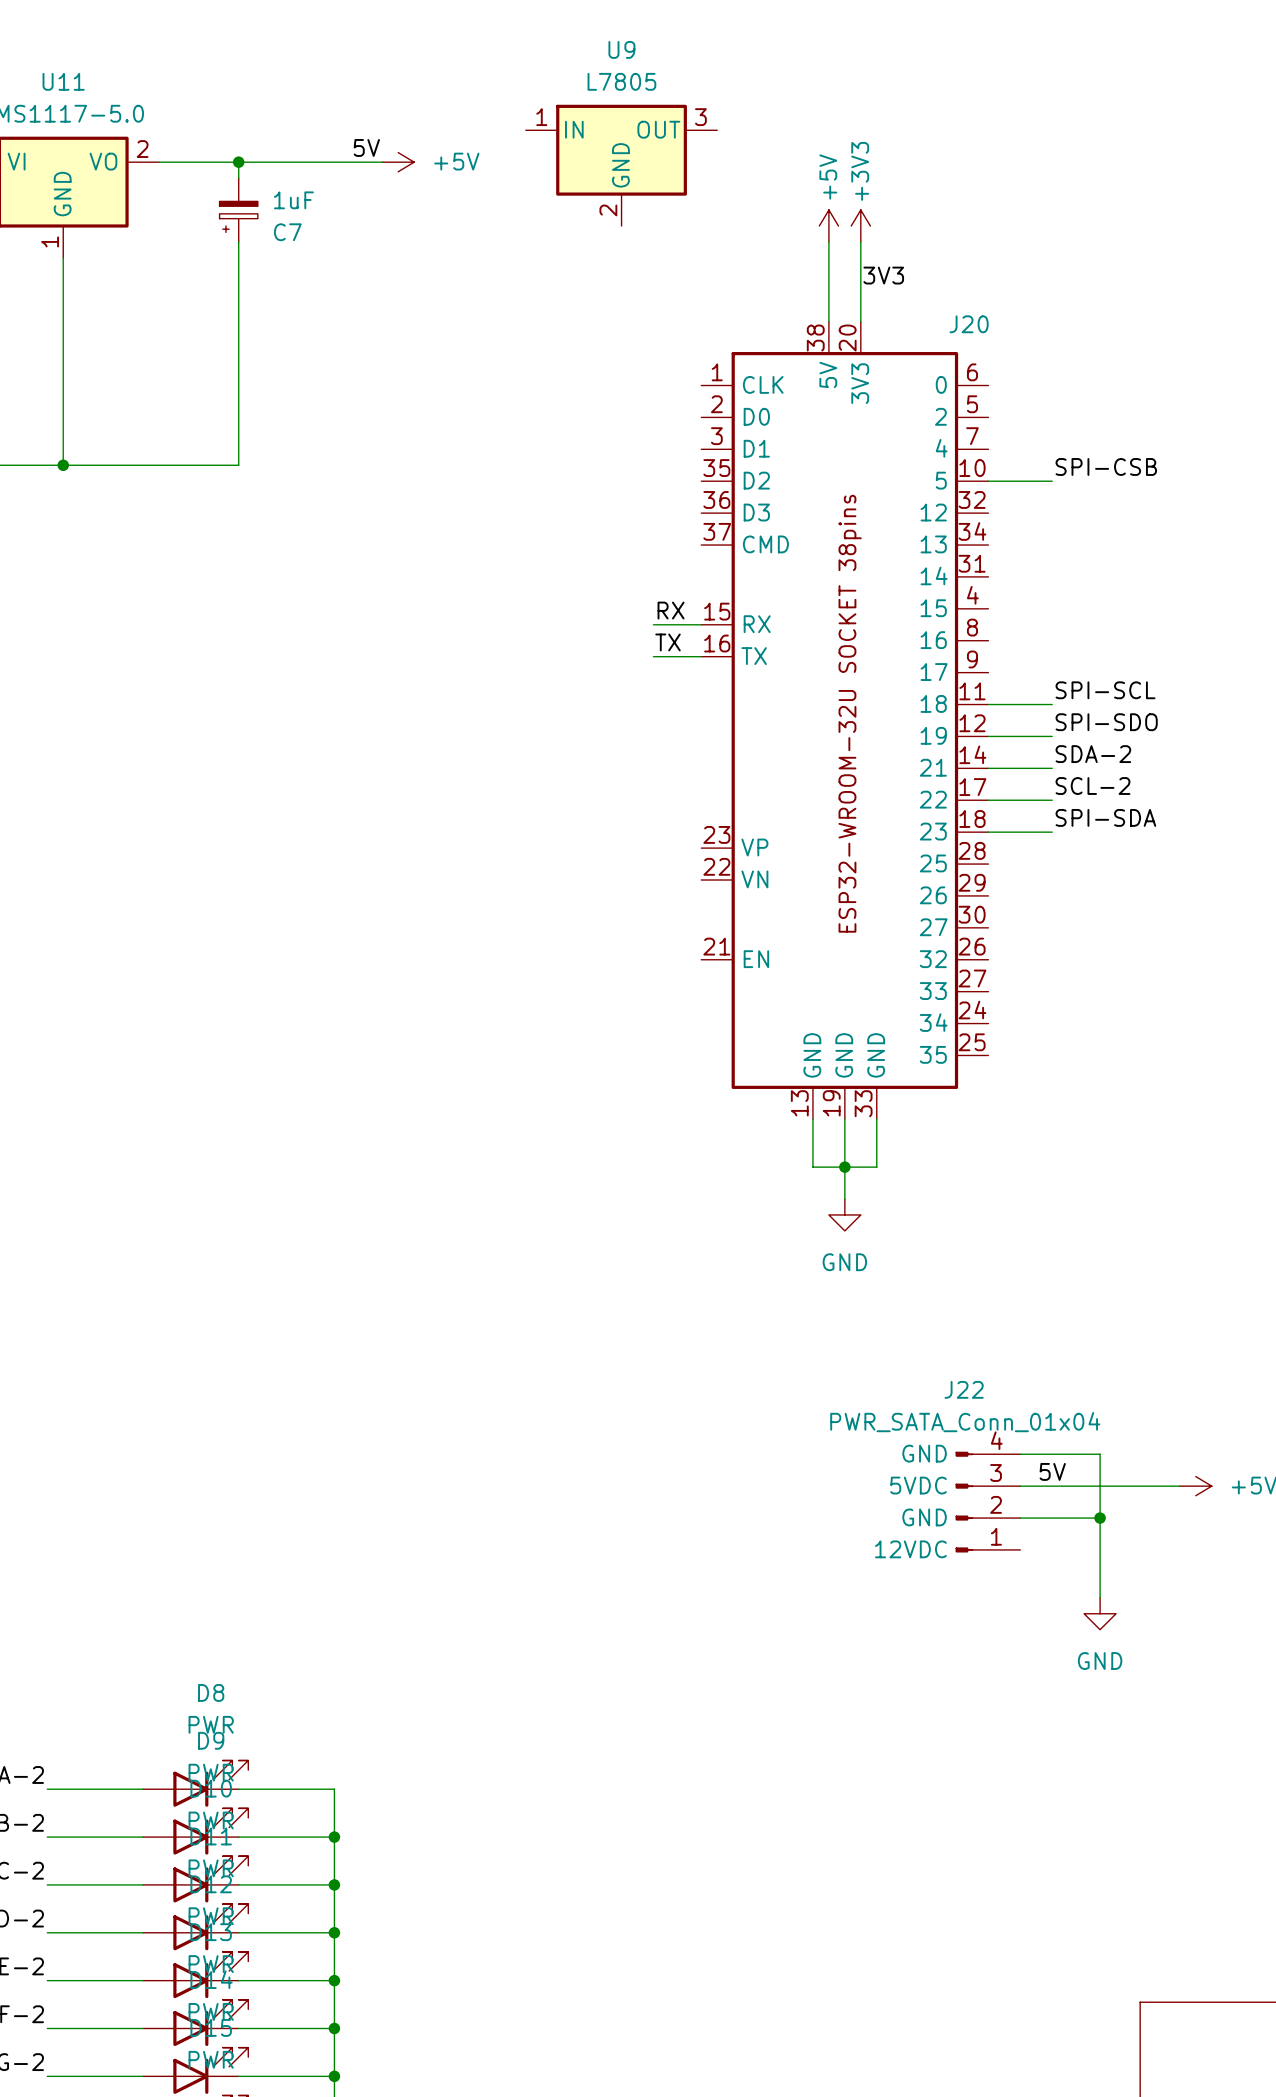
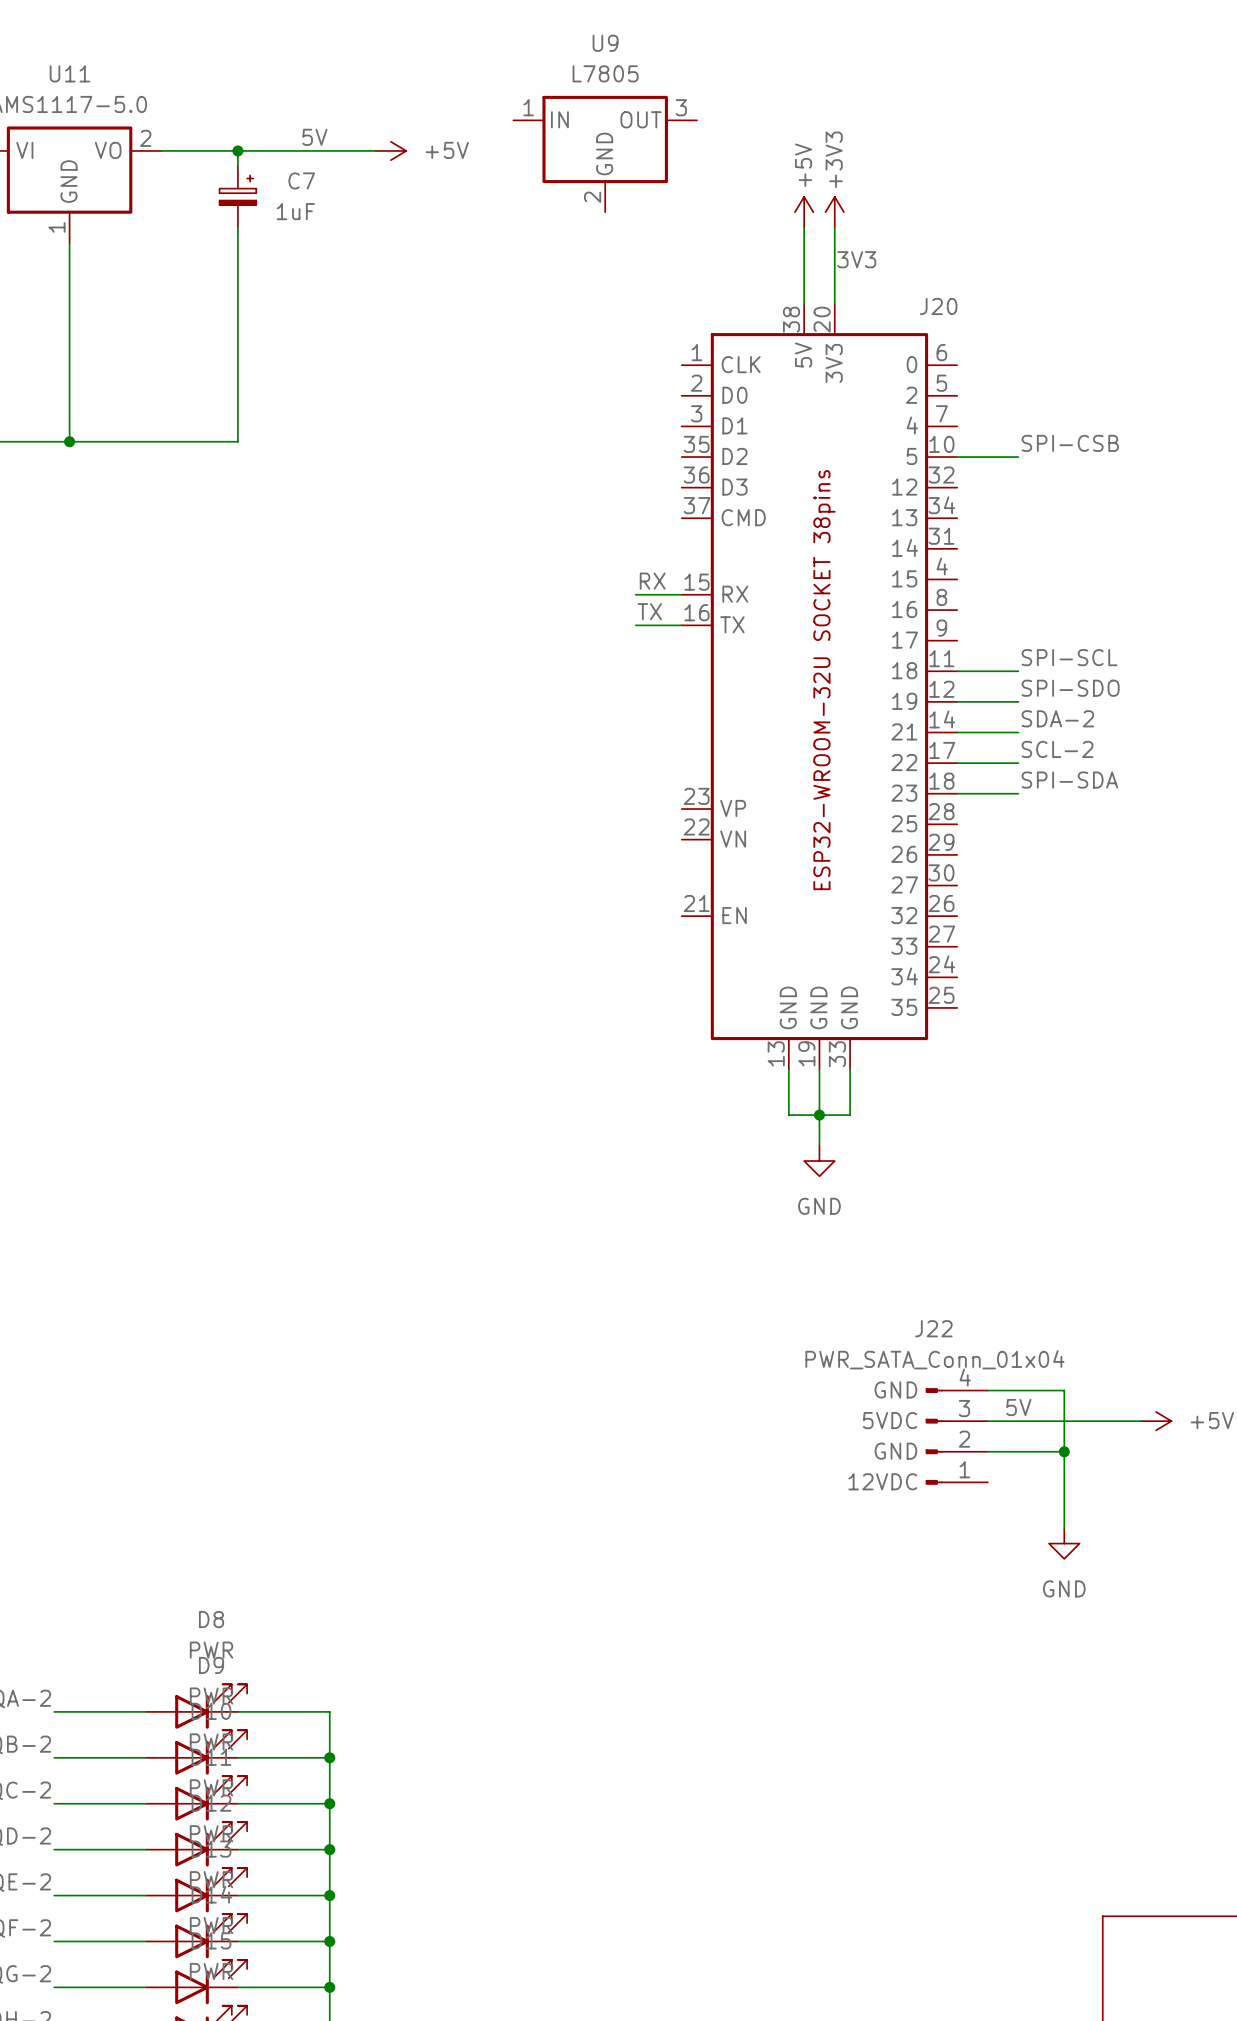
label position: 5V (366, 147) -> 5V (314, 137)
C7 rotation: 0° (238, 216) -> 180° (237, 190)
C7 name position: C7 (287, 232) -> C7 (301, 181)

